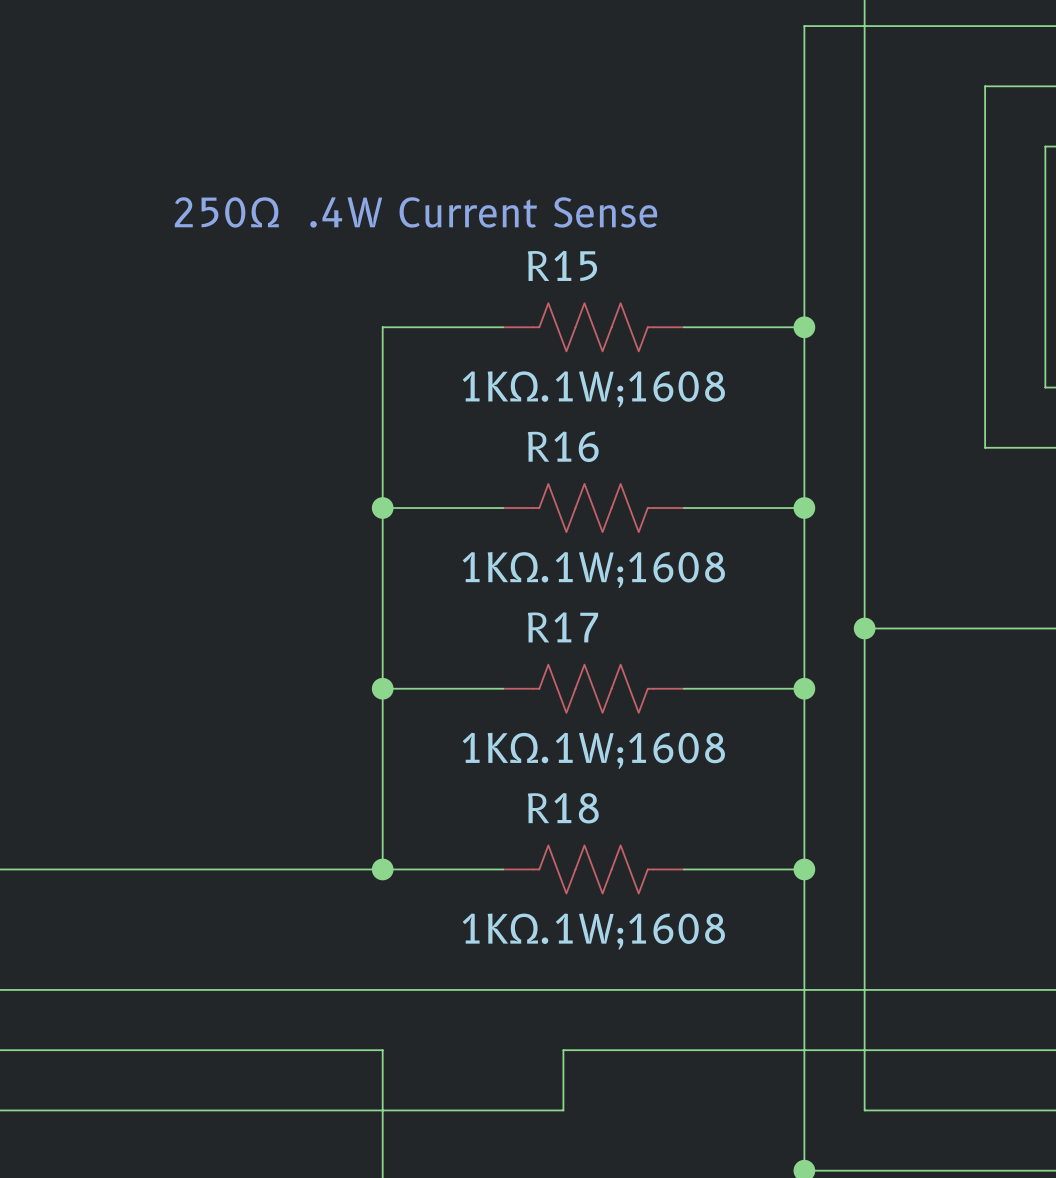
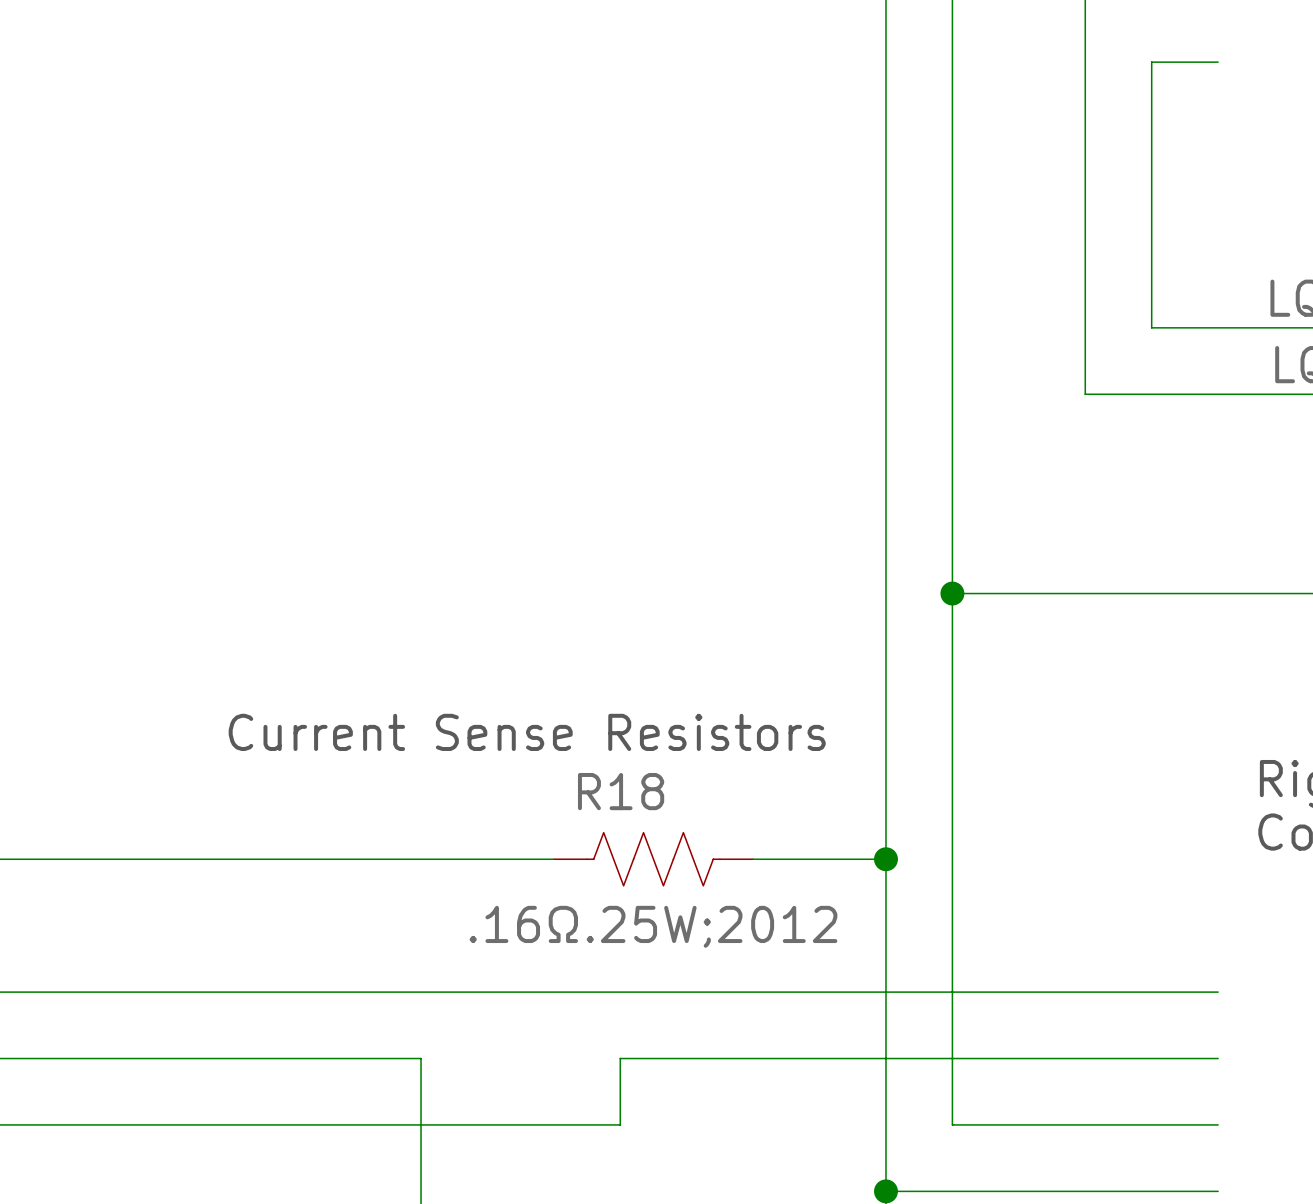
text: 250Ω .4W Current Sense (416, 212) -> none
wire: (503, 327) (382, 327) (382, 869) -> none
R15: 1KΩ.1W;1608 (593, 327) -> none
wire: (683, 327) (804, 327) -> none
junction: (804, 327) -> none
wire: (382, 508) (503, 508) -> none
junction: (382, 508) -> none
R16: 1KΩ.1W;1608 (593, 508) -> none
wire: (683, 508) (804, 508) -> none
junction: (804, 508) -> none
wire: (382, 688) (503, 688) -> none
junction: (382, 688) -> none
R17: 1KΩ.1W;1608 (593, 688) -> none
wire: (683, 688) (804, 688) -> none
junction: (804, 688) -> none
text: none -> Current Sense Resistors (527, 732)
junction: (382, 869) -> none
R18 value: 1KΩ.1W;1608 (593, 931) -> .16Ω.25W;2012 (653, 926)

